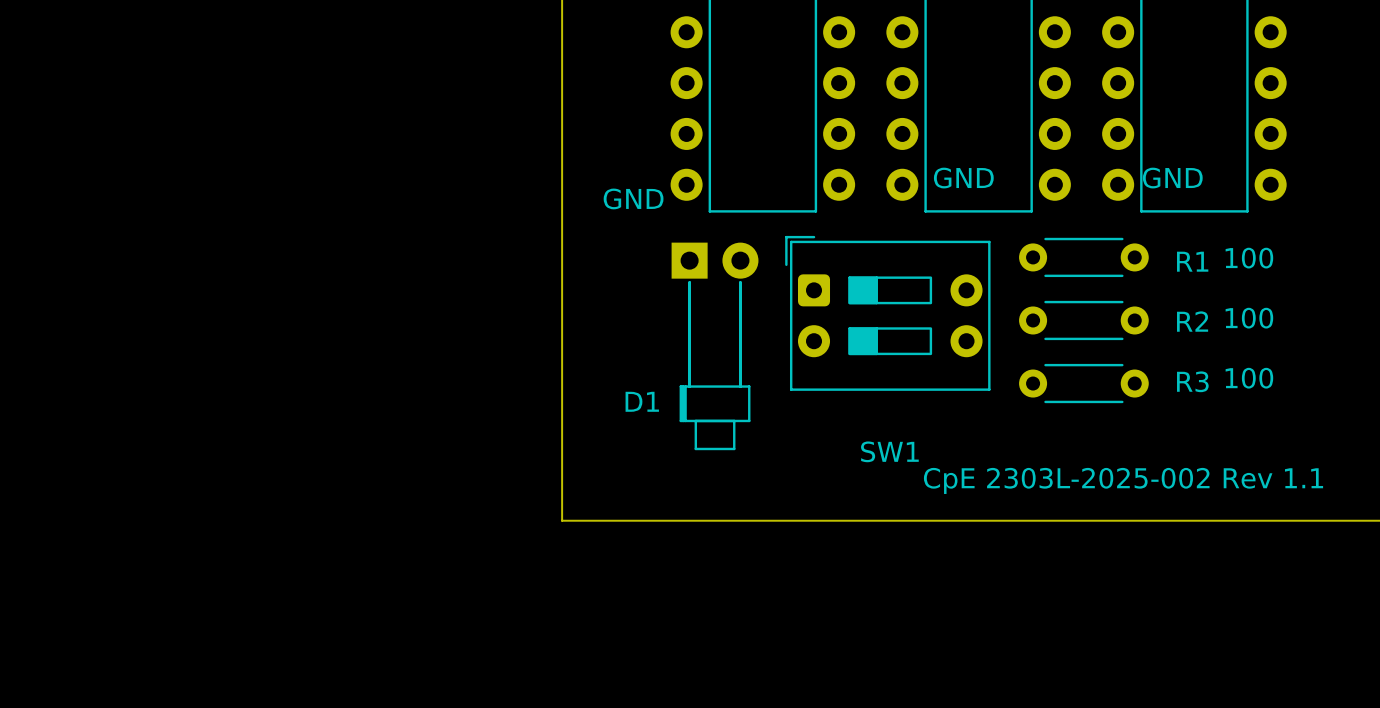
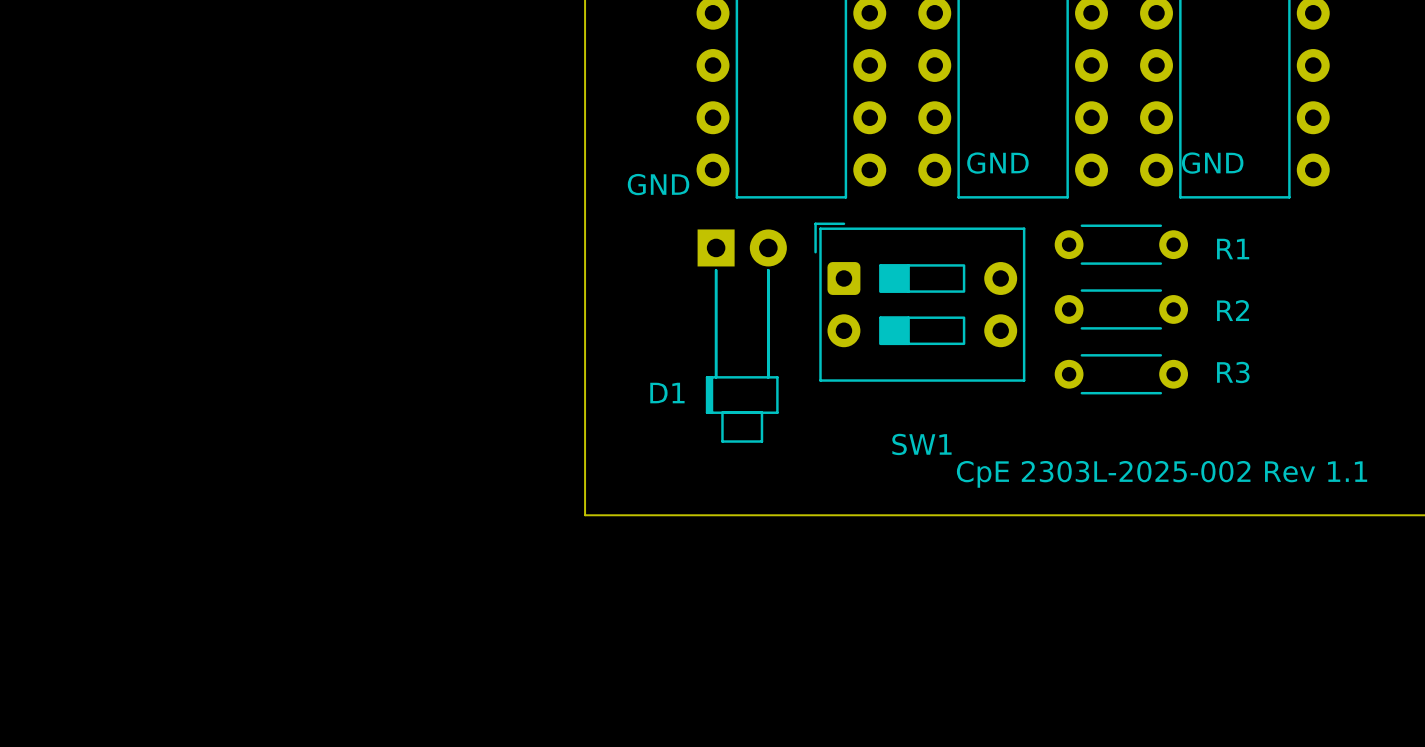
text: 100 (1249, 258) -> none
text: 100 (1249, 318) -> none
text: 100 (1249, 378) -> none

